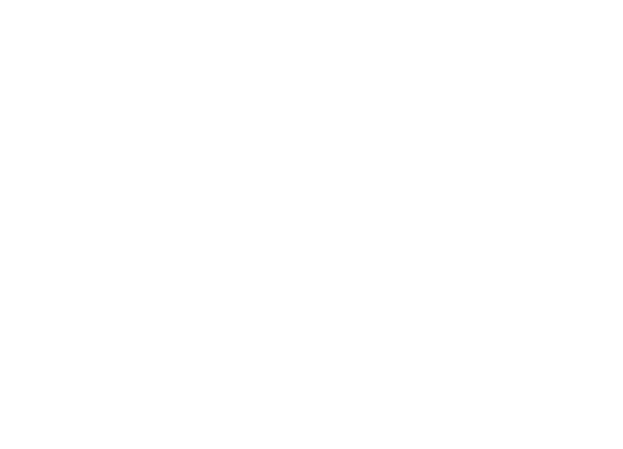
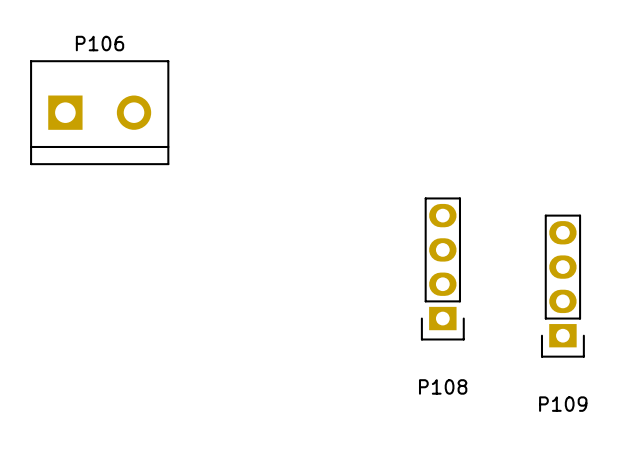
P106: none -> (99, 112)
P108: none -> (442, 268)
P109: none -> (562, 286)

